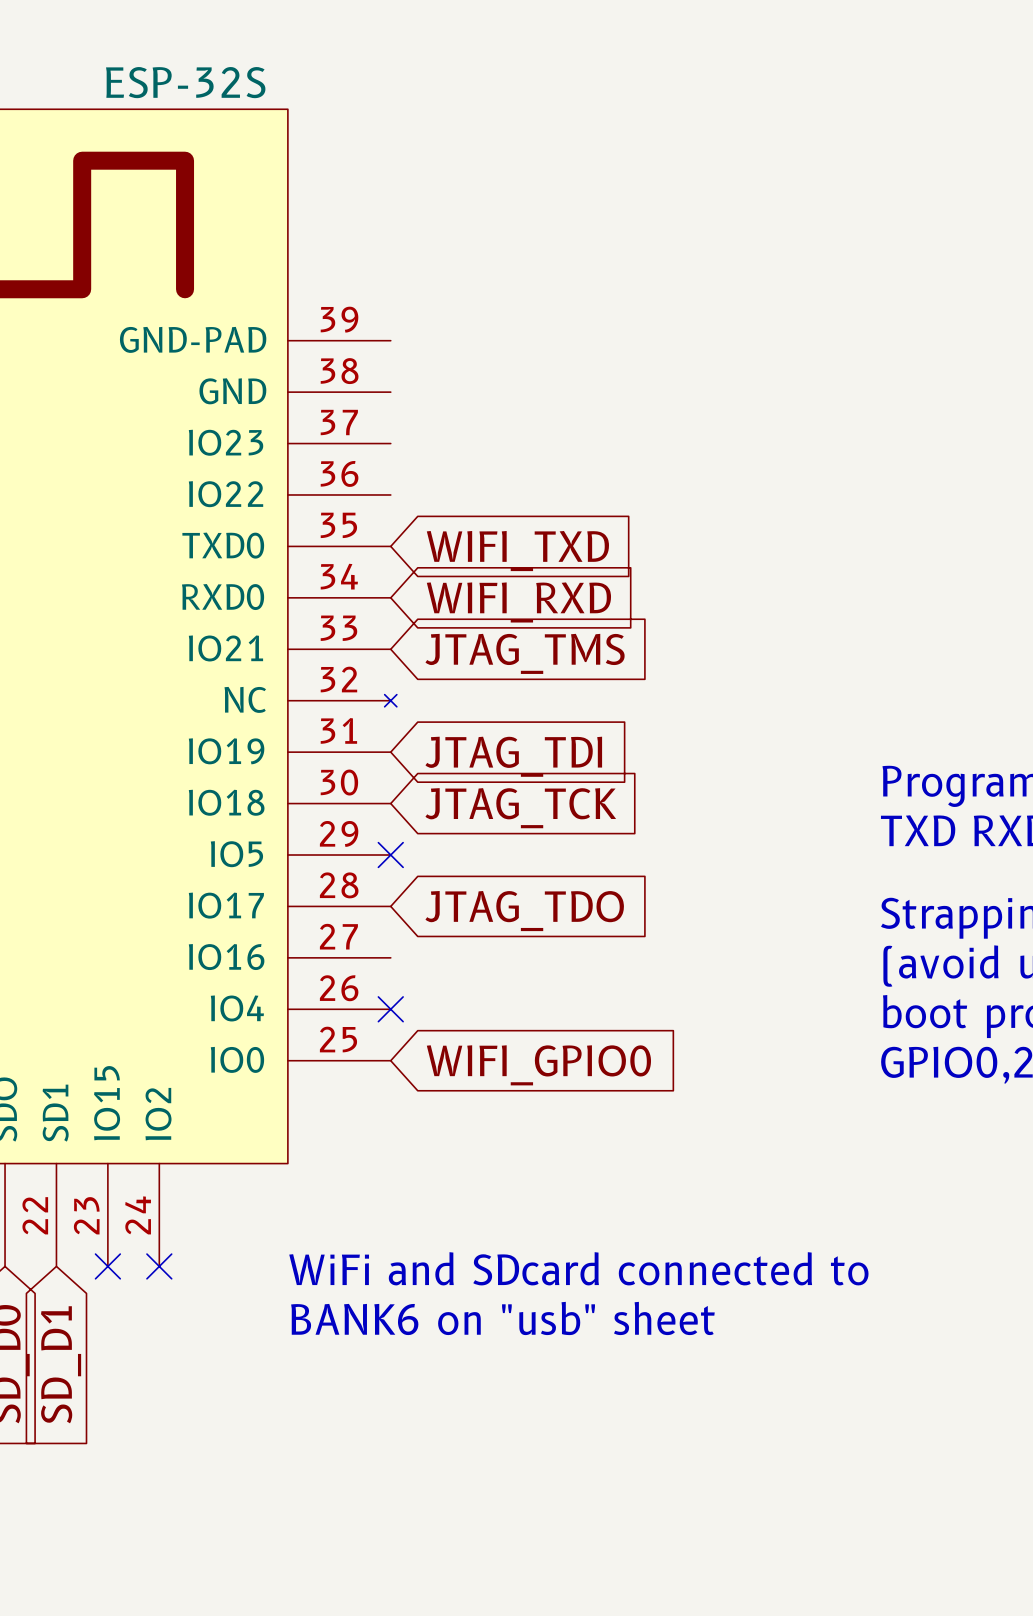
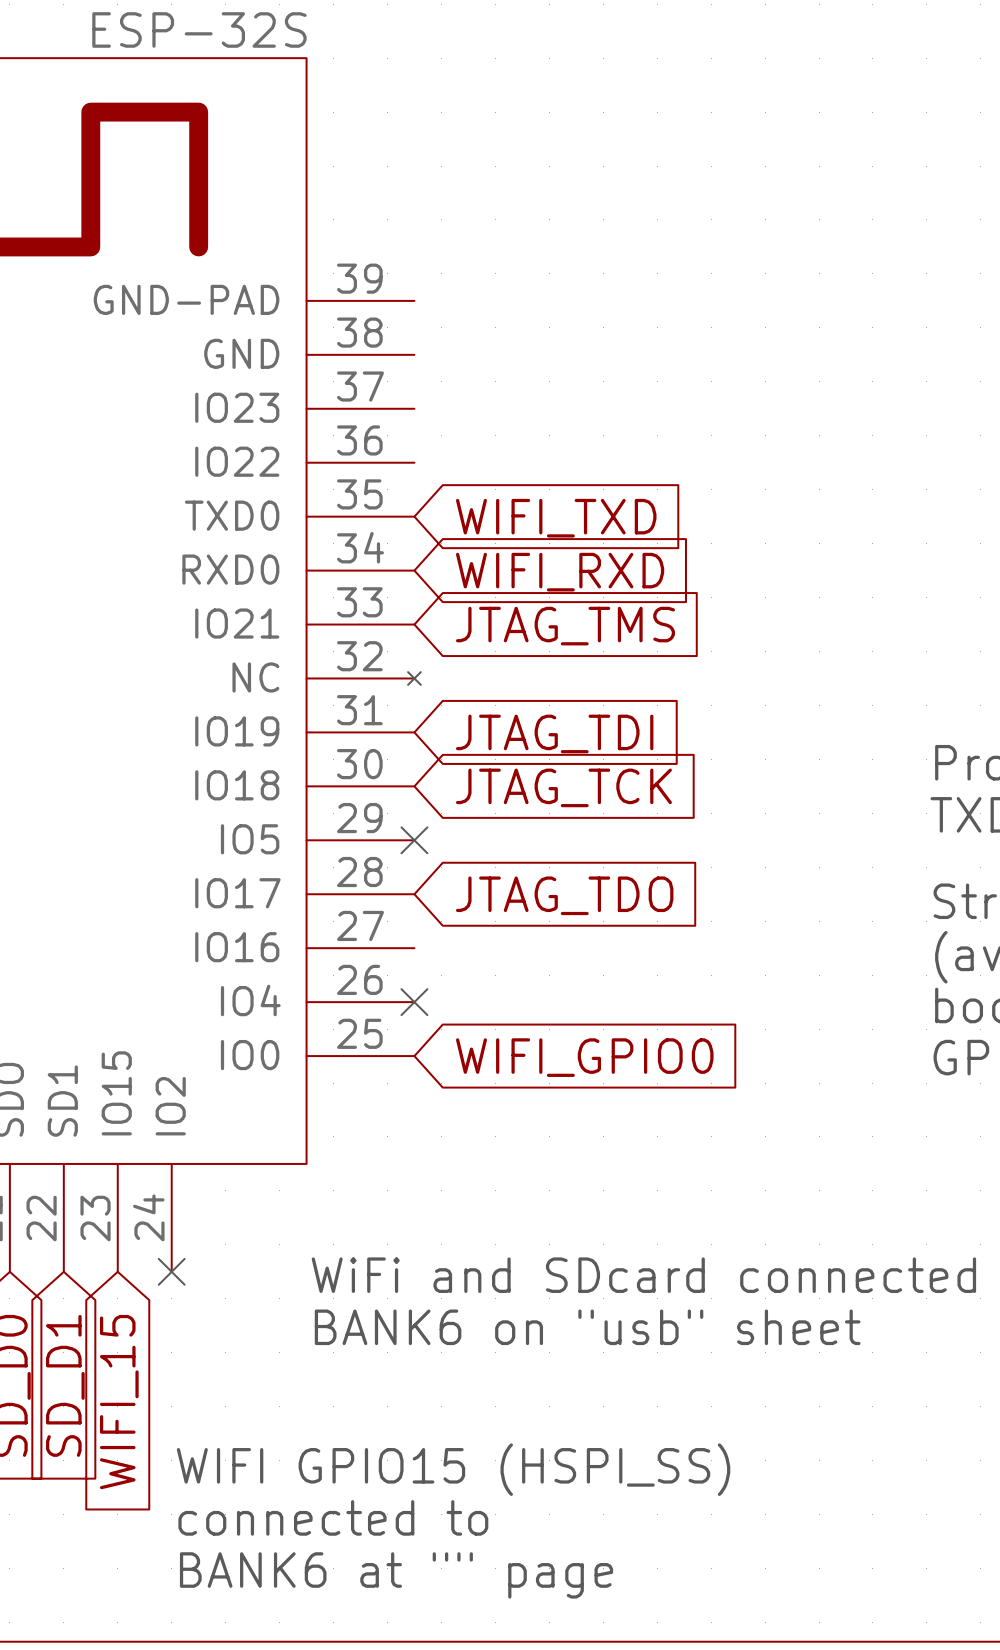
no-connect mark: (107, 1266) -> none
global label: none -> WIFI_15 (119, 1402)
text: none -> WIFI GPIO15 (HSPI_SS) (453, 1469)
text: none -> connected to (333, 1517)
text: none -> BANK6 at "" page (396, 1575)

